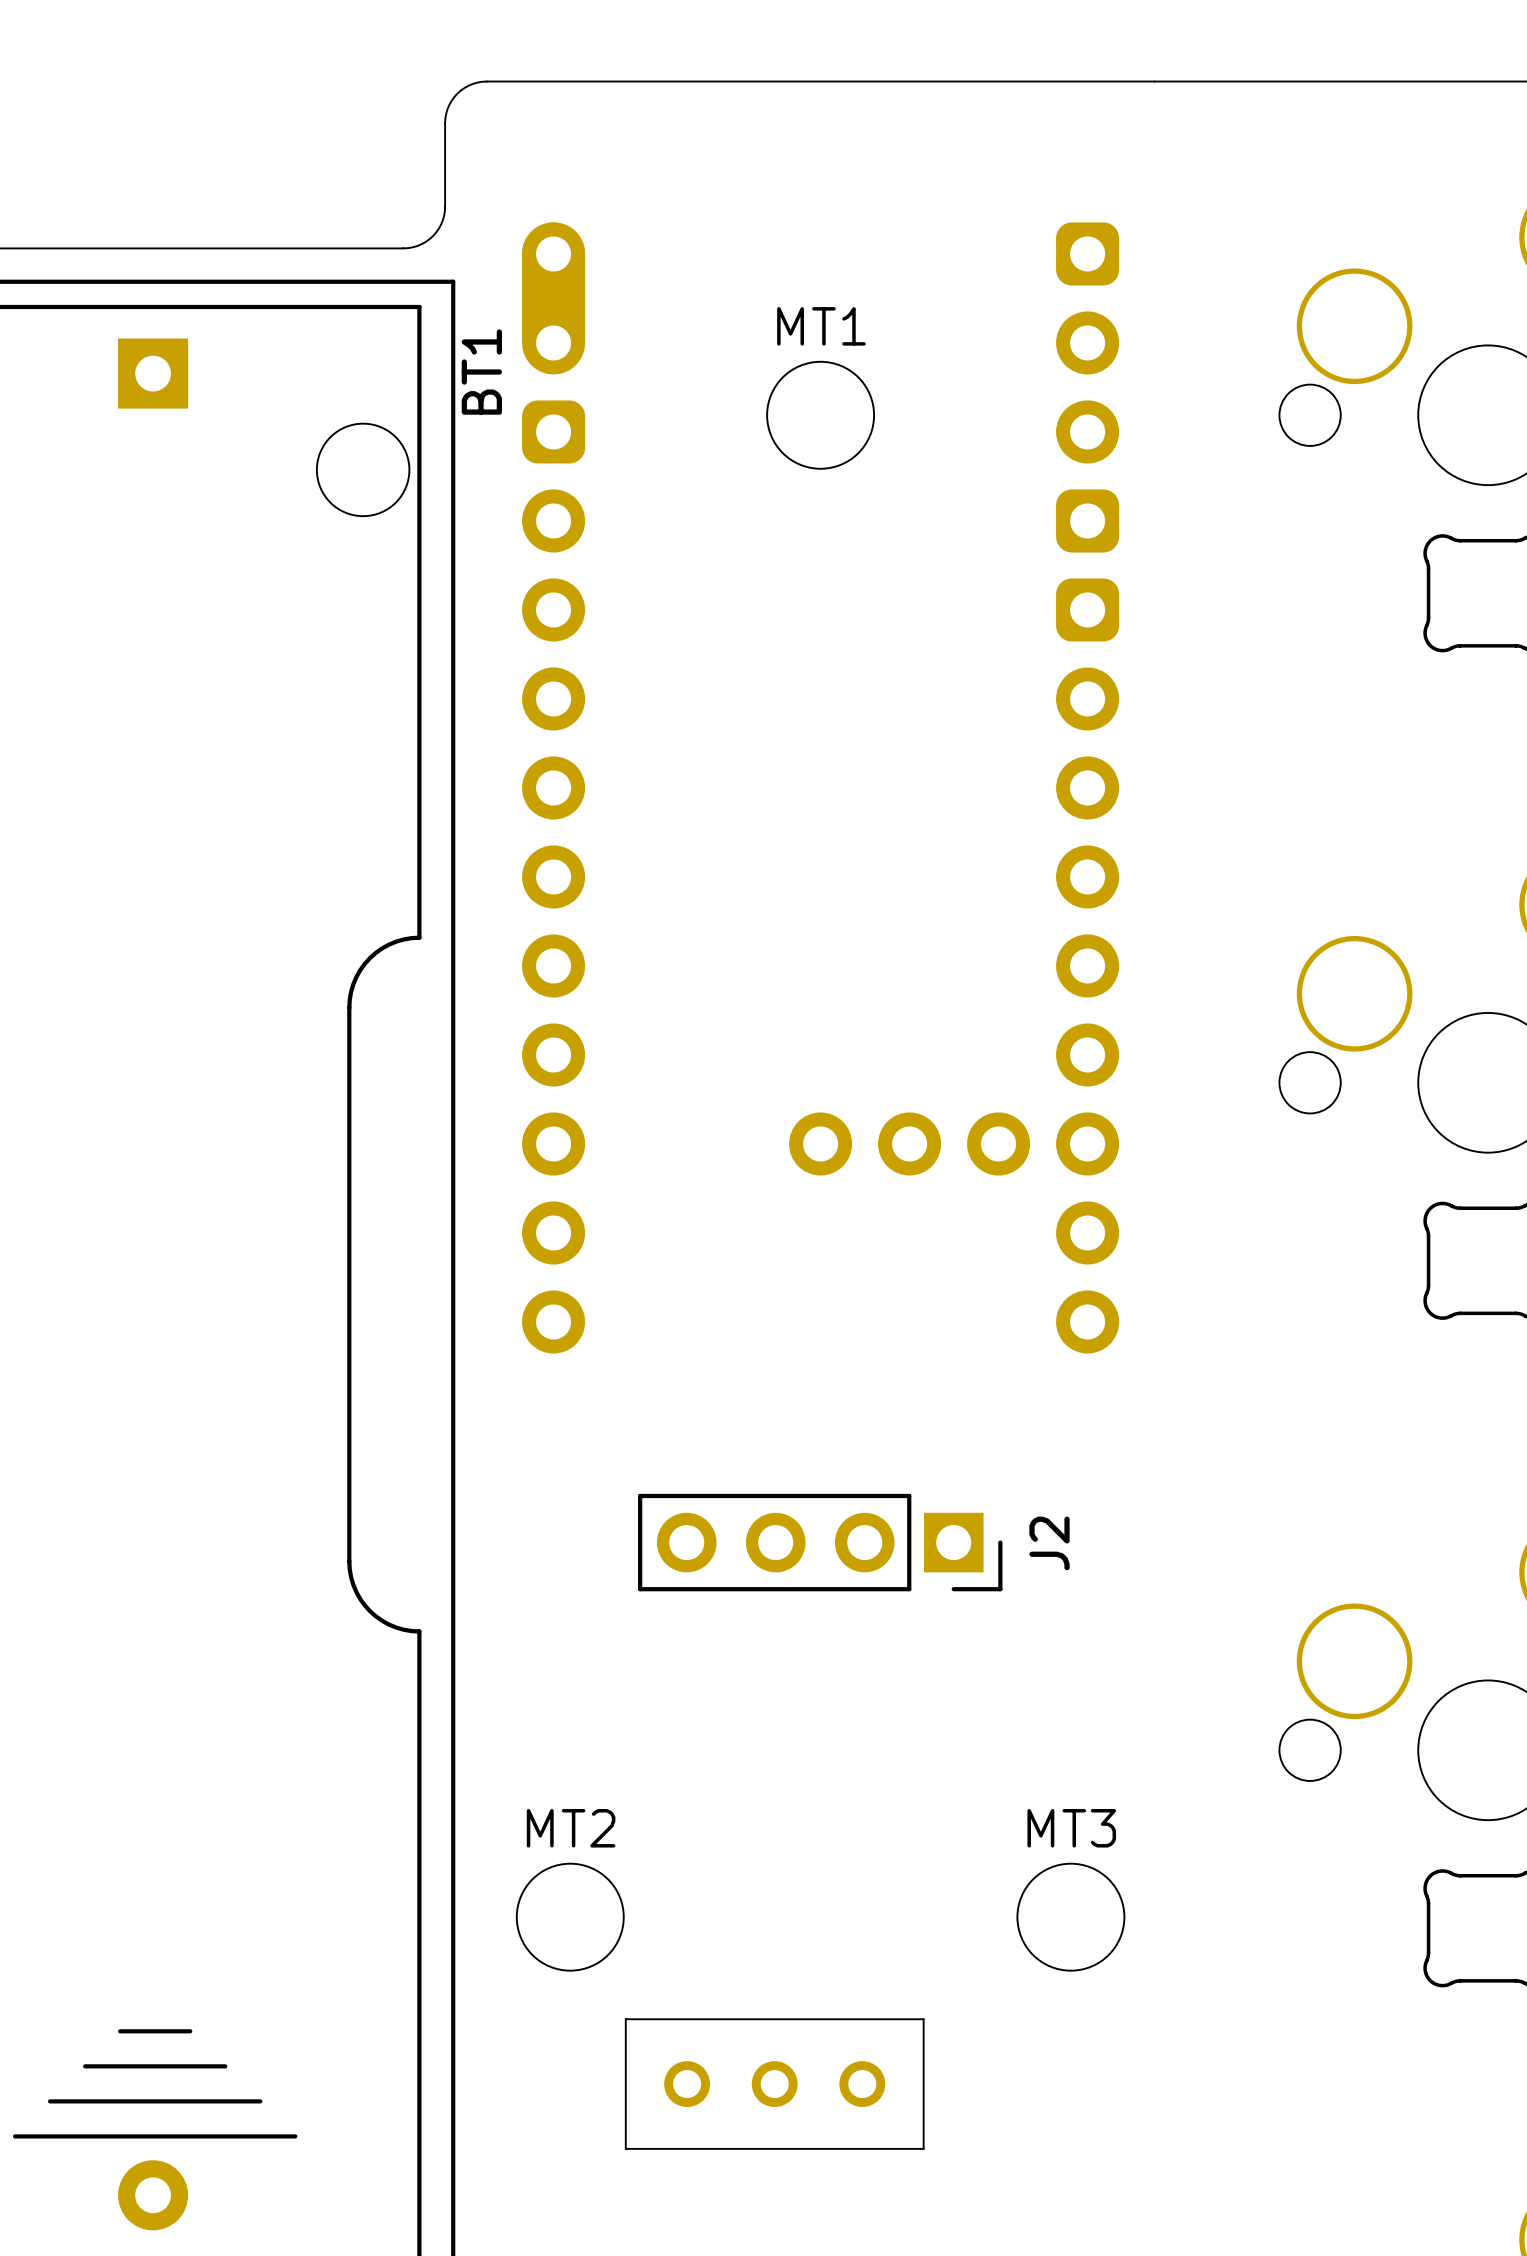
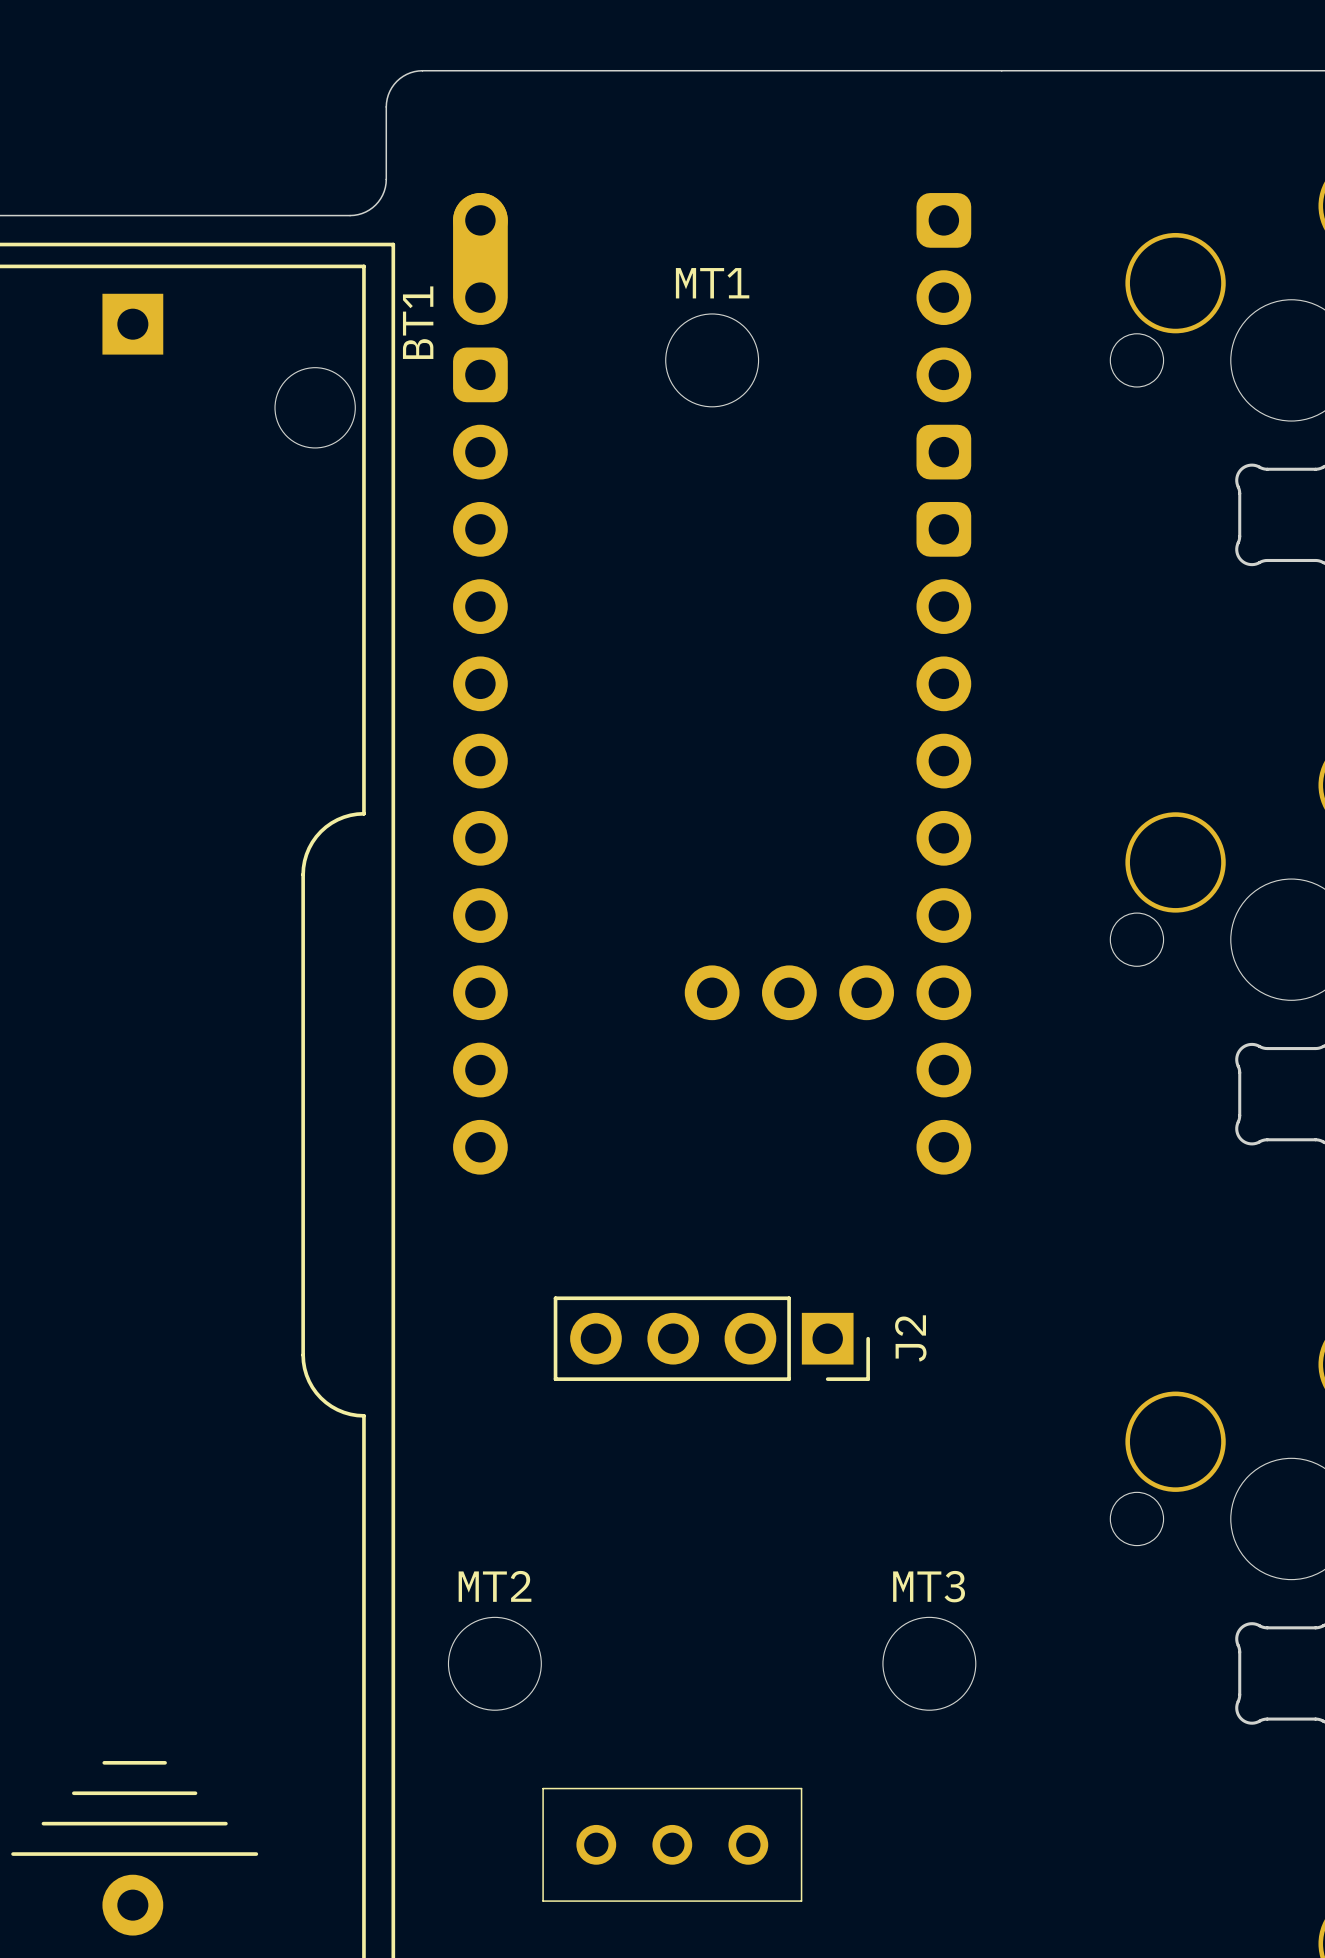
part position: (774, 2084) -> (672, 1844)

